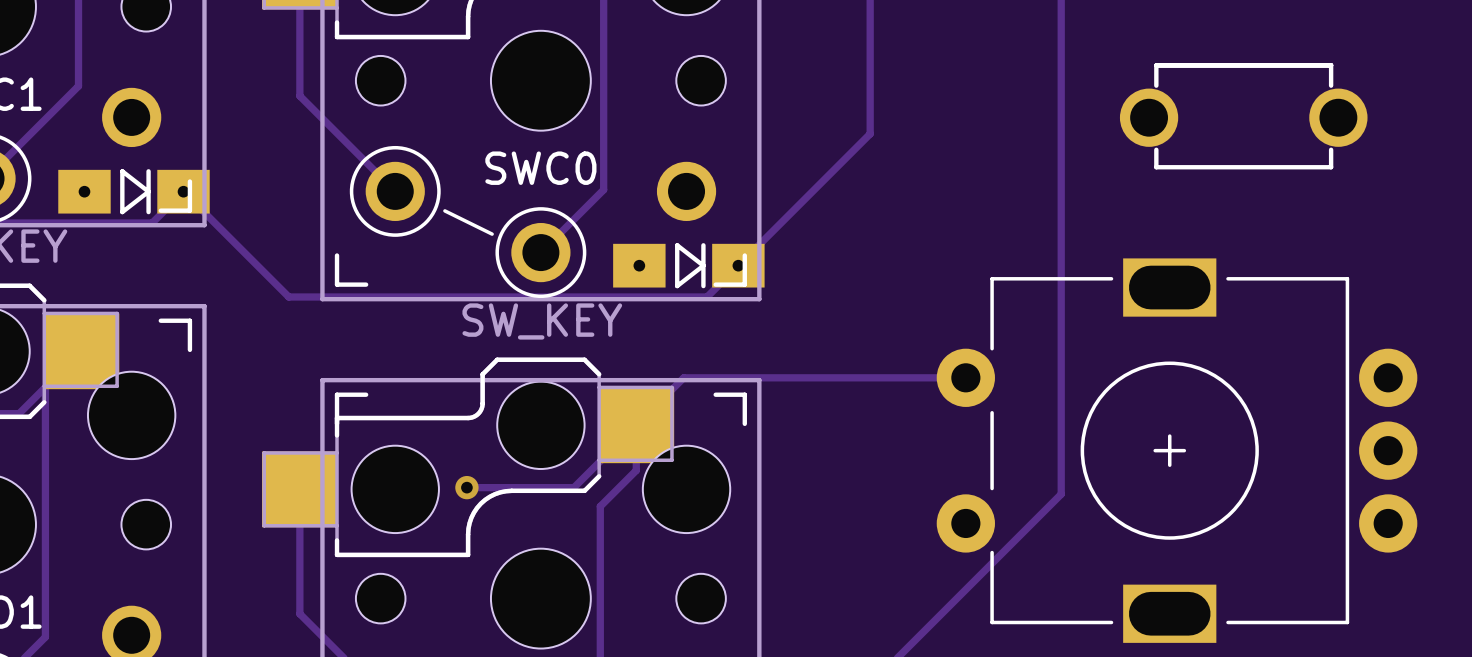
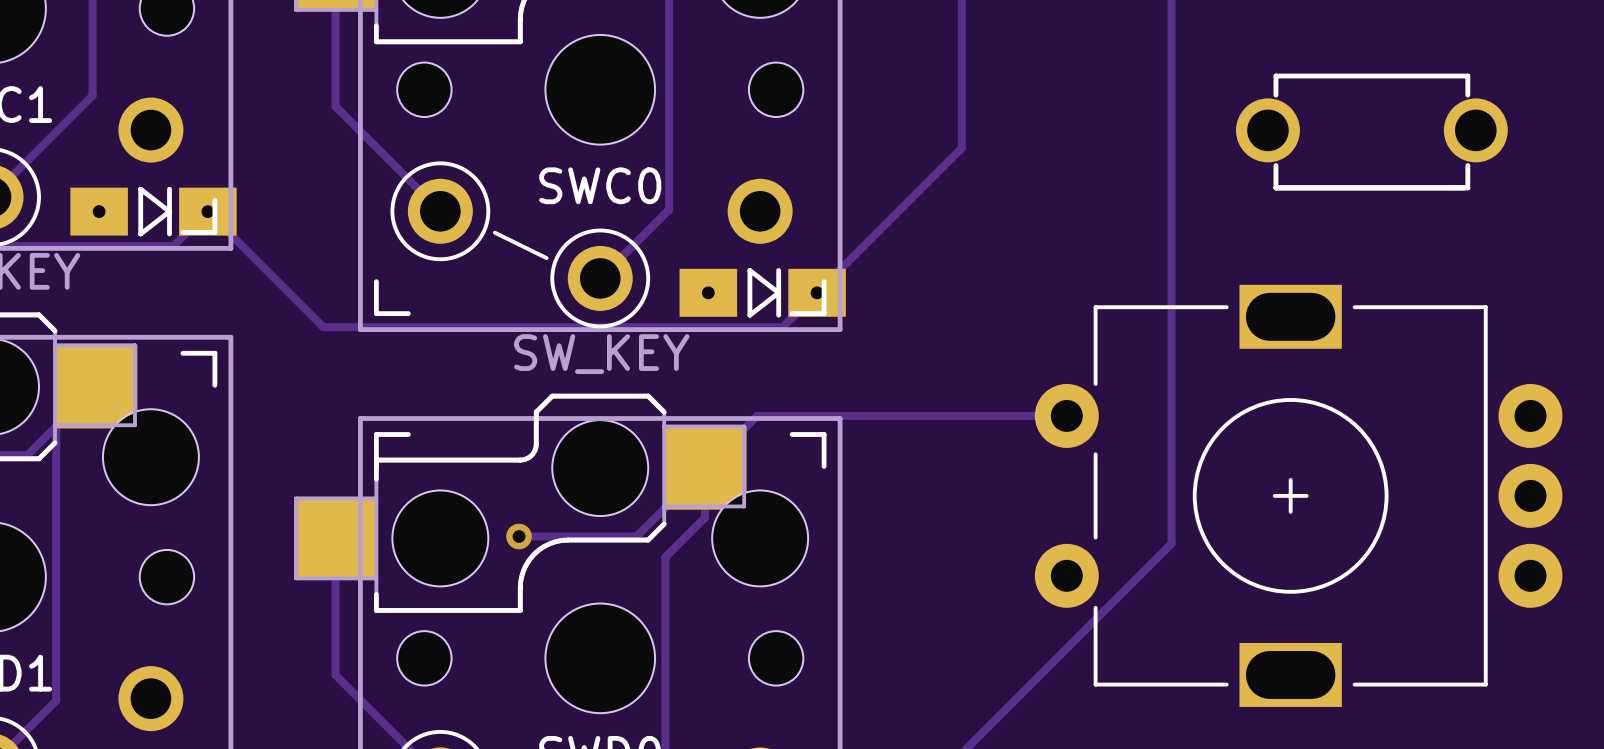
part rotation: 0° (1243, 116) -> 180° (1371, 131)

